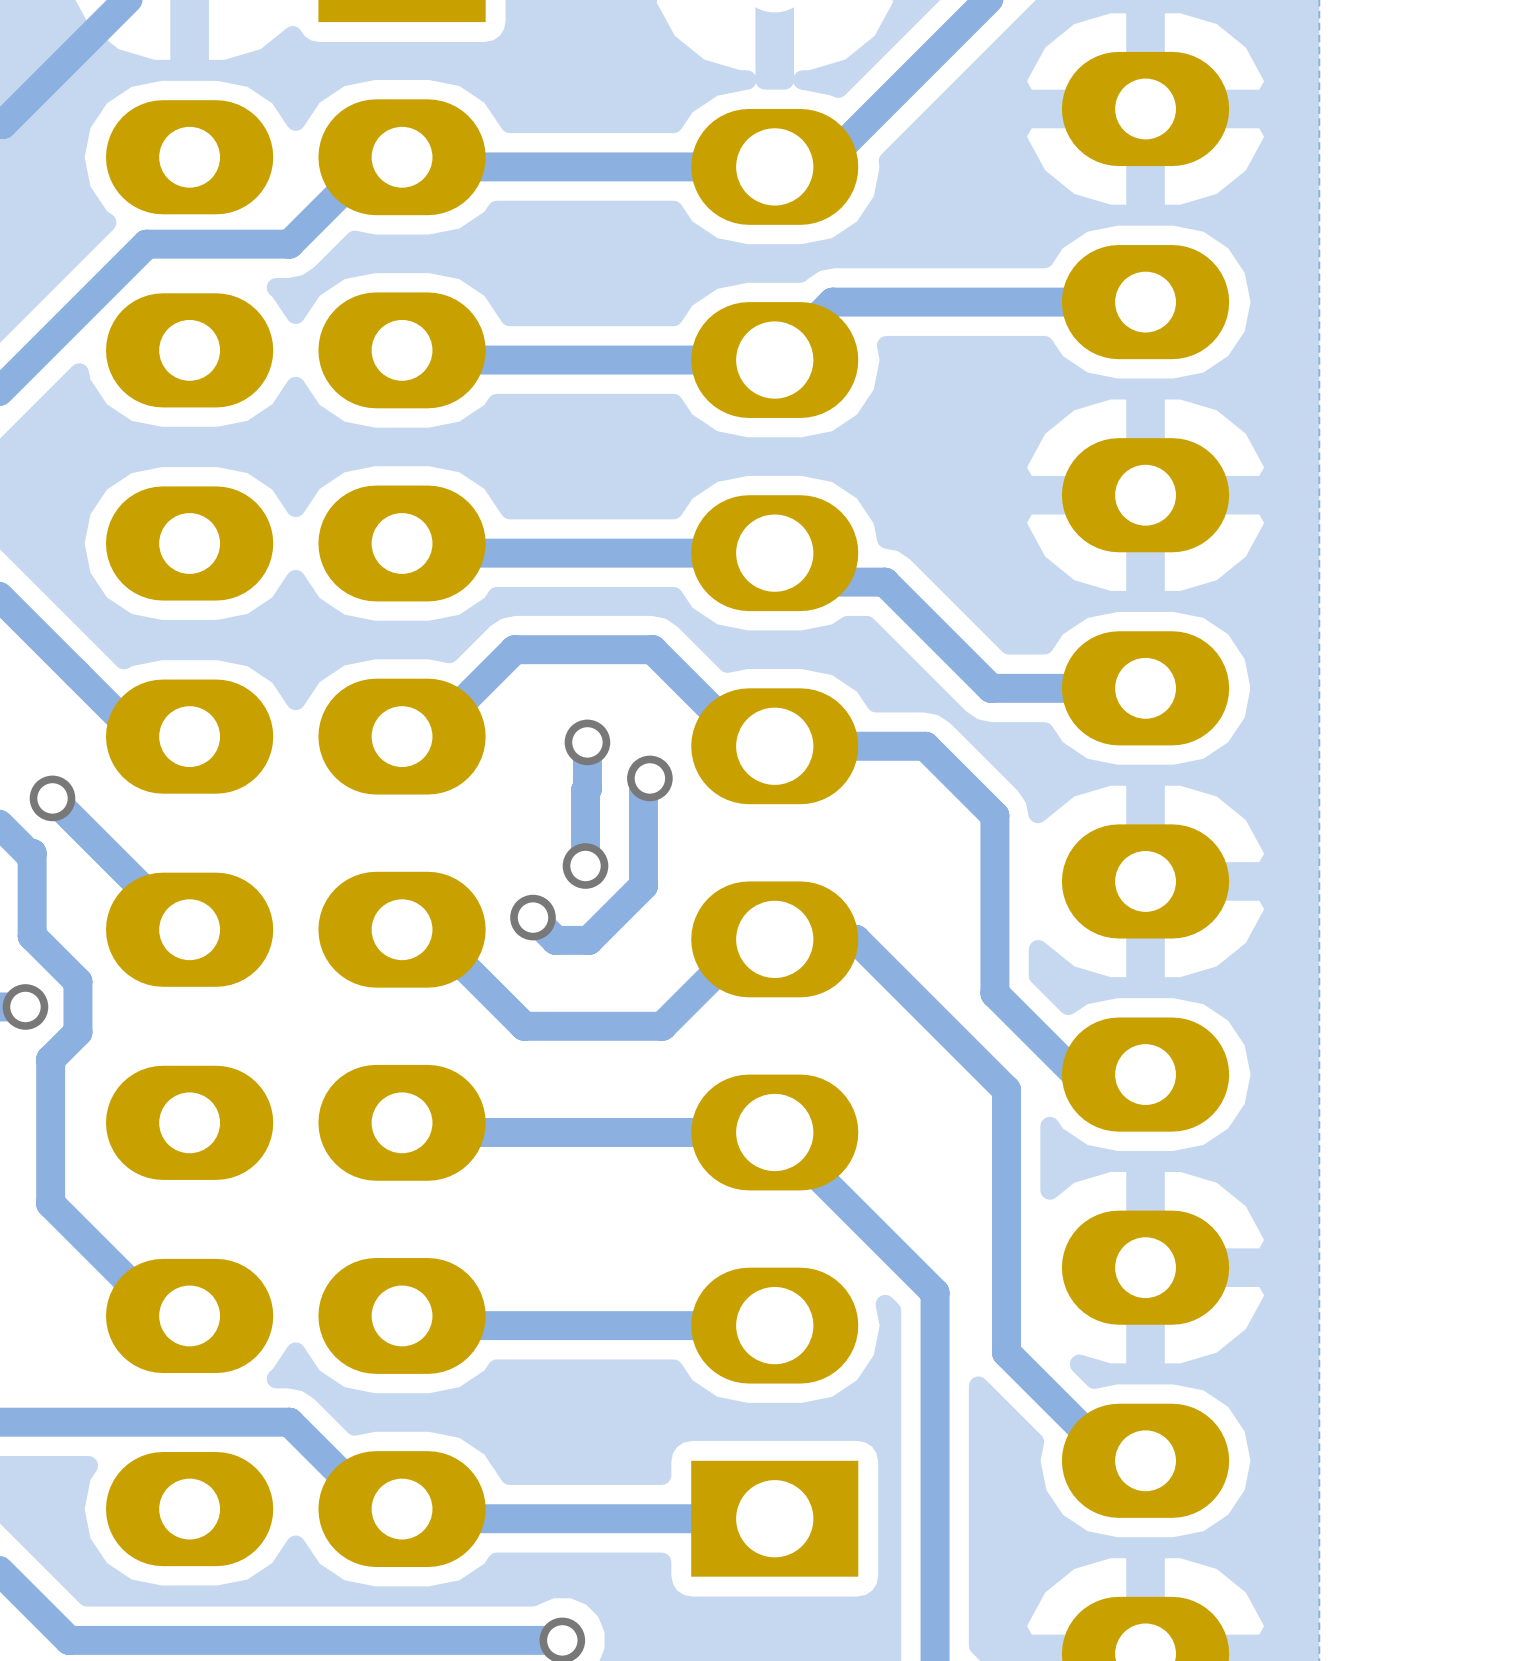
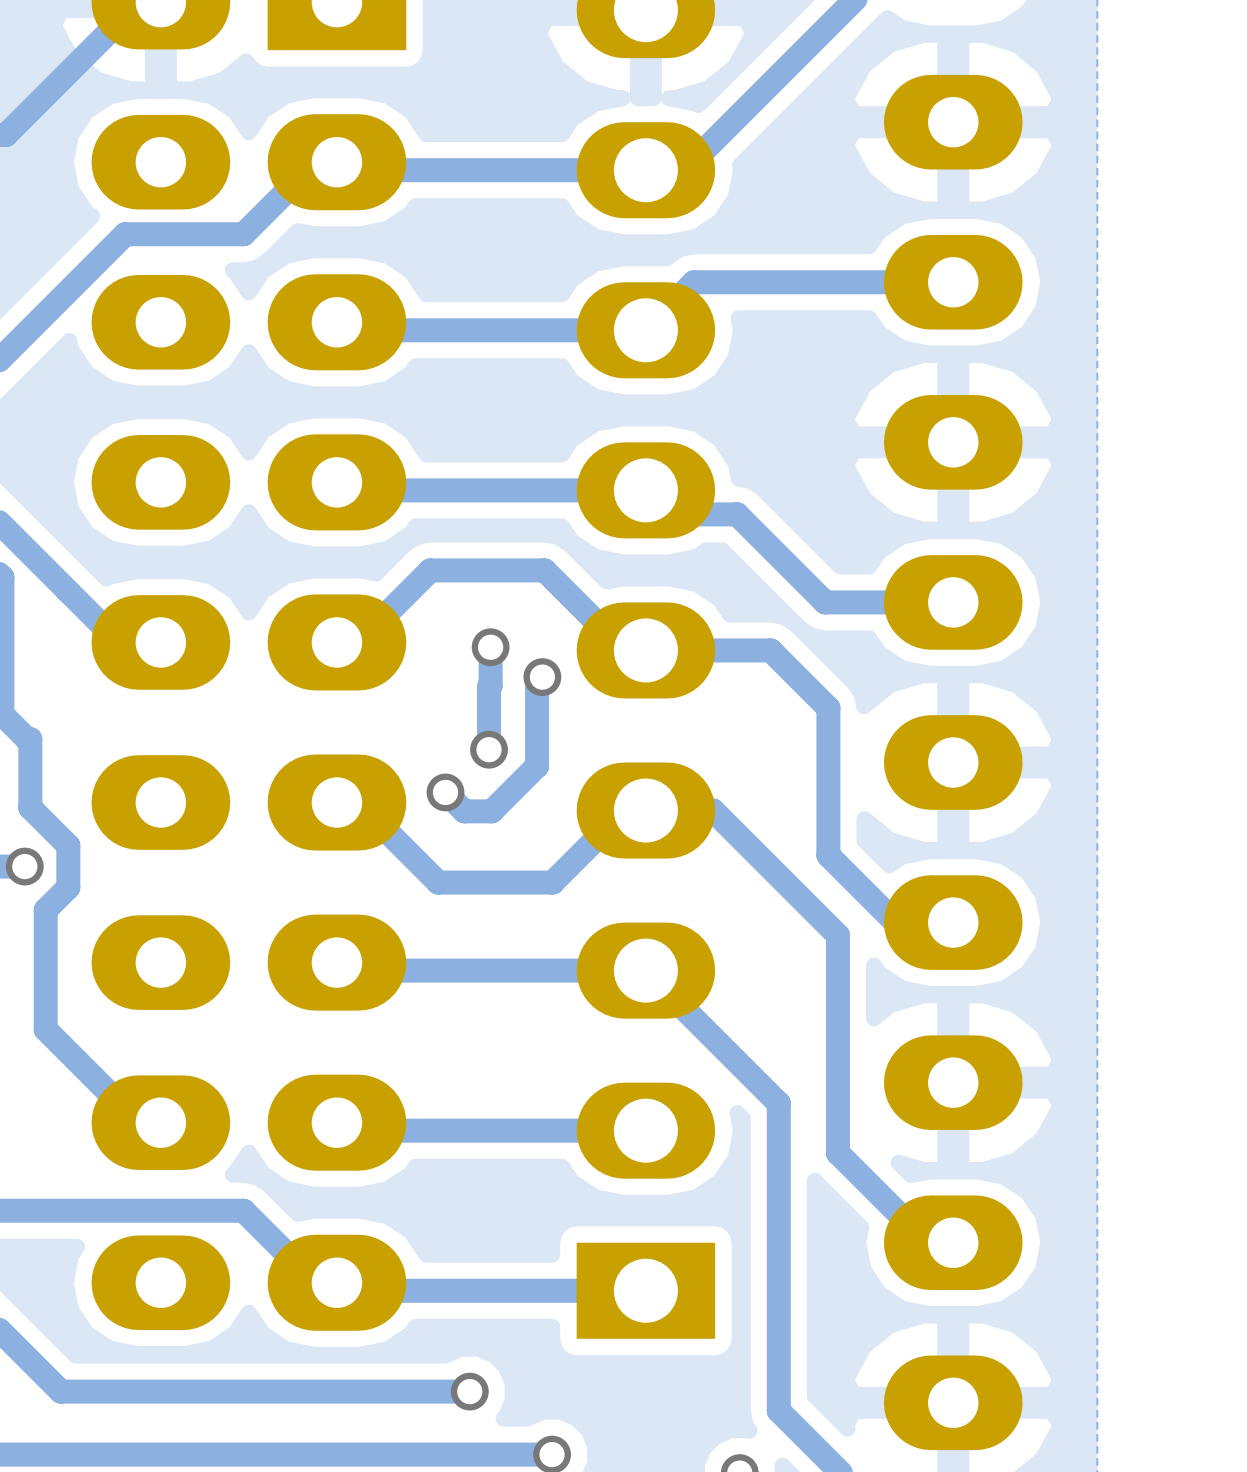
track: (52, 798) (183, 929) -> none
via: (52, 798) -> none

